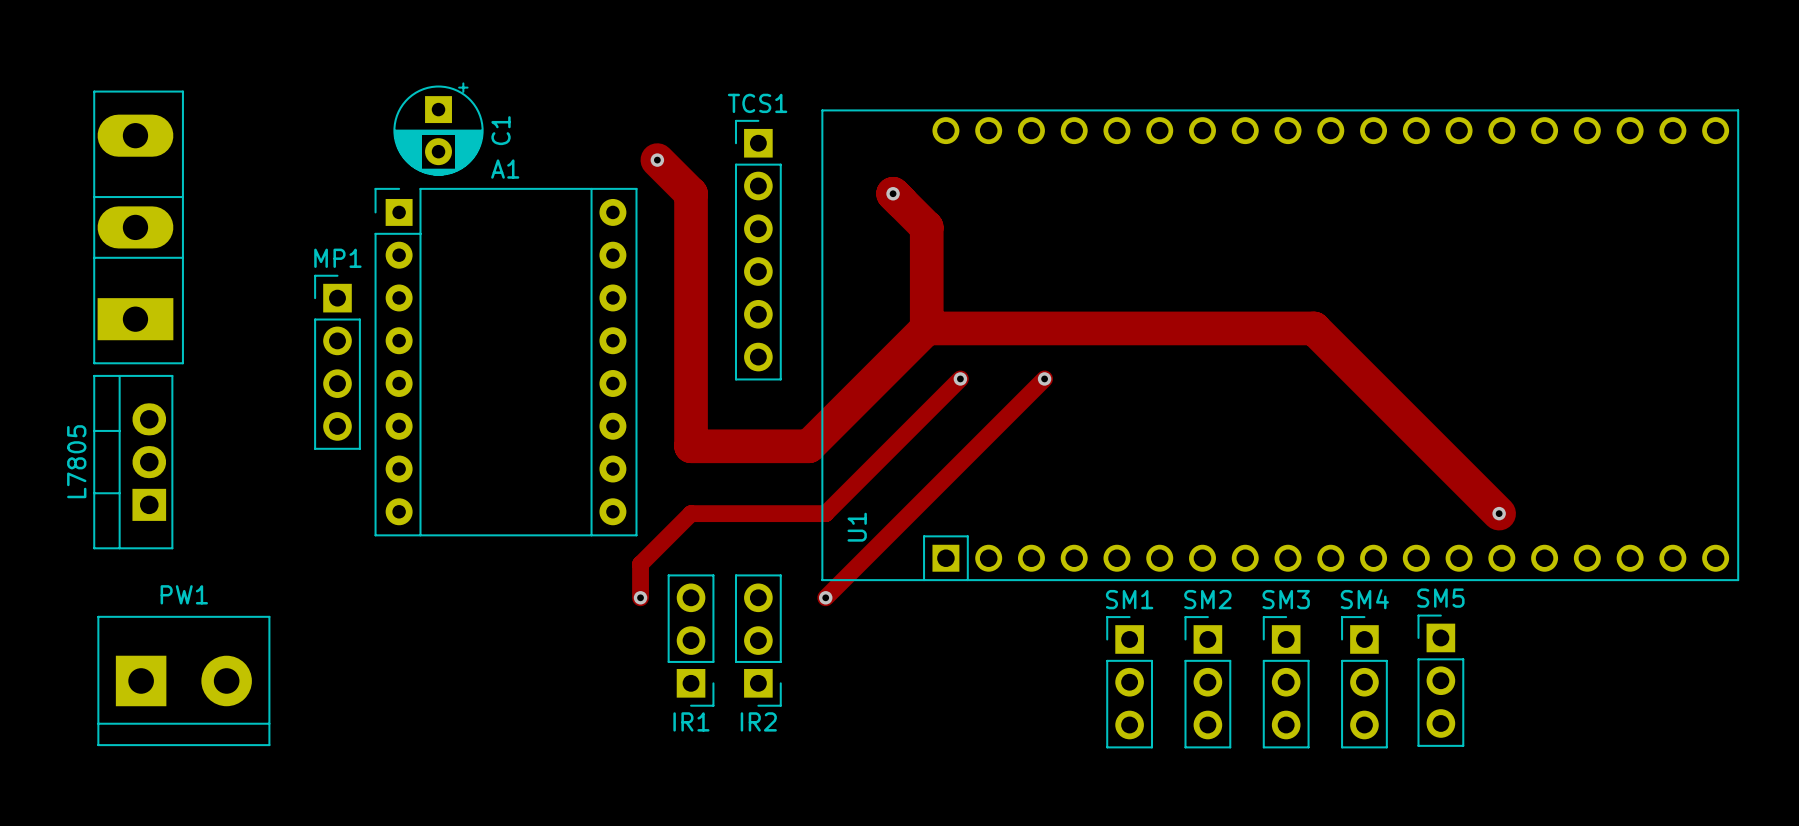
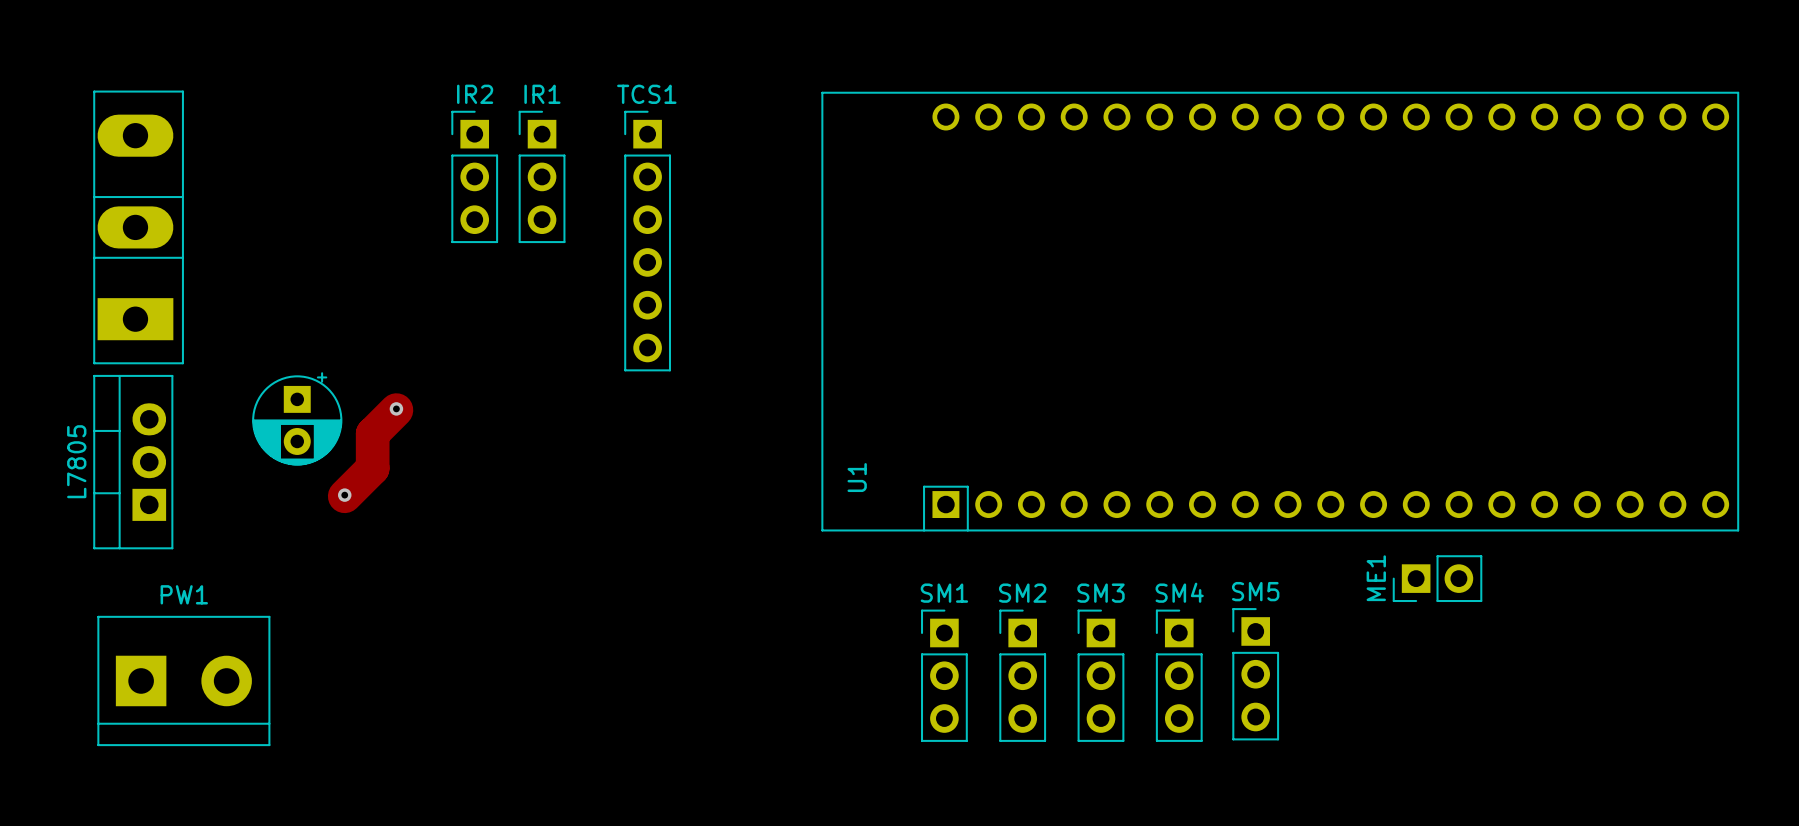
U1 footprint: [821, 109, 1740, 582] -> [821, 91, 1740, 532]
C1: (438, 129) -> none
track: (657, 160) (691, 193) (691, 446) (808, 446) (926, 328) -> none
via: (657, 160) -> none
track: (893, 193) (926, 227) (926, 328) -> none
via: (893, 193) -> none
TCS1 position: (758, 250) -> (647, 241)
track: (926, 328) (1313, 328) (1499, 513) -> none
MP1: (337, 362) -> none
A1: (506, 362) -> none
track: (960, 378) (825, 513) (691, 513) (640, 564) (640, 597) -> none
via: (960, 378) -> none
track: (1044, 378) (825, 597) -> none
via: (1044, 378) -> none
via: none -> (396, 408)
track: none -> (396, 410) (372, 433) (372, 468) (344, 496)
part: none -> (297, 418)
via: none -> (344, 495)
via: (1499, 513) -> none
ME1: none -> (1437, 578)
via: (640, 597) -> none
via: (825, 597) -> none
IR1 rotation: 0° (691, 640) -> 180° (542, 176)
IR1 position: (691, 640) -> (542, 176)
IR2 rotation: 0° (758, 640) -> 180° (474, 176)
IR2 position: (758, 640) -> (474, 176)
SM5 position: (1440, 680) -> (1255, 674)
SM1 position: (1129, 682) -> (944, 675)
SM2 position: (1207, 682) -> (1022, 675)
SM3 position: (1286, 682) -> (1100, 675)
SM4 position: (1364, 682) -> (1179, 675)

